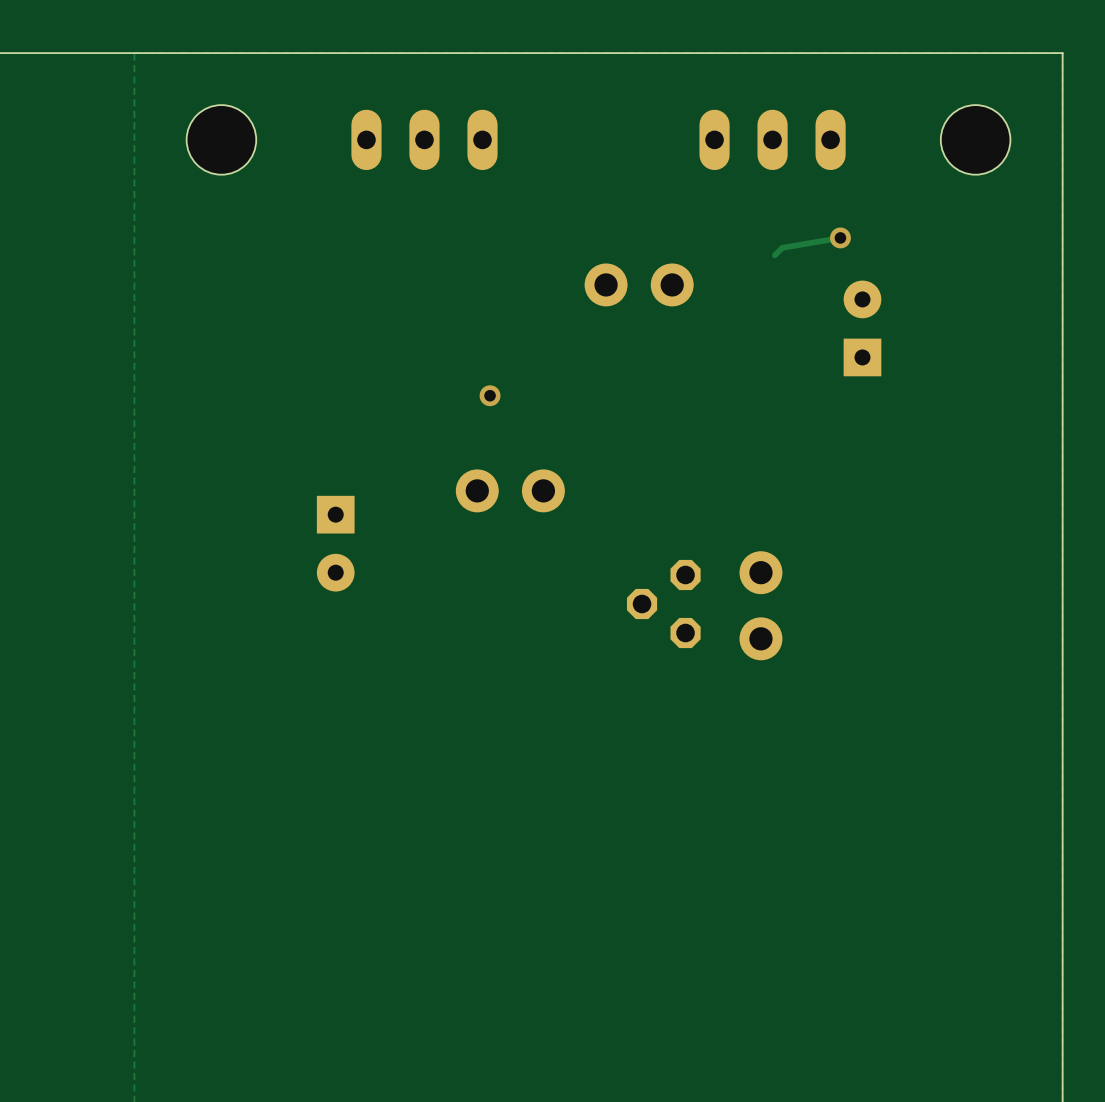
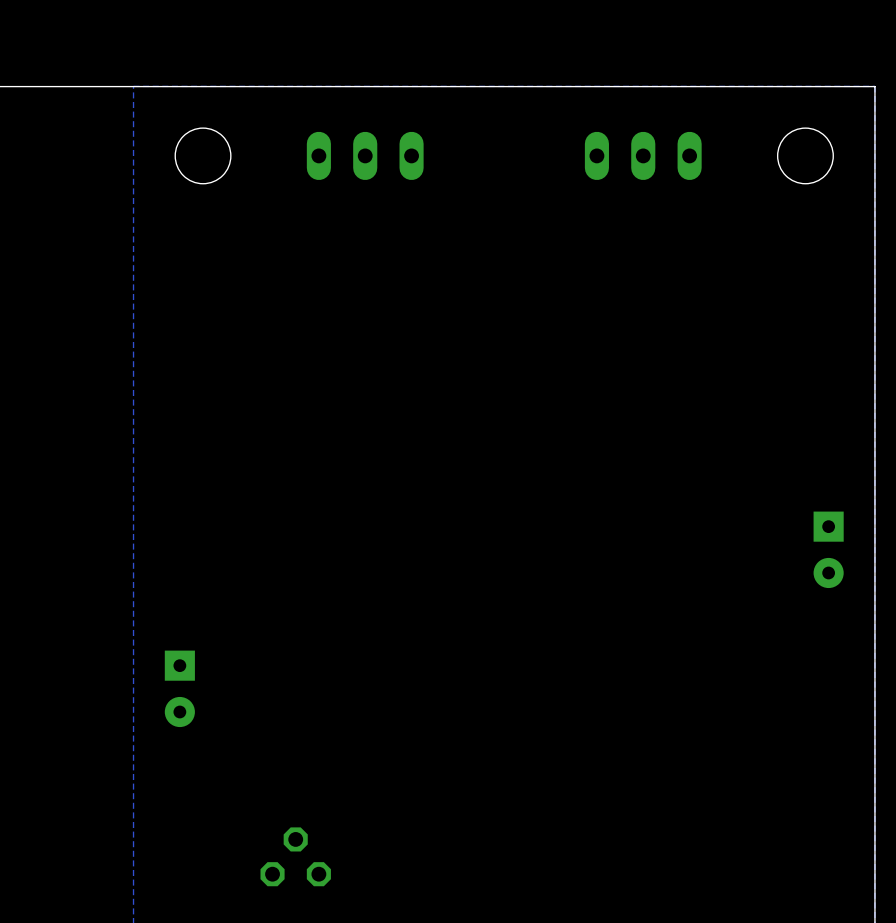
track: (840, 237) (782, 247) (774, 255) -> none
via: (840, 237) -> none
part: (639, 284) -> none
part rotation: 0° (862, 328) -> 180° (828, 549)
part position: (862, 328) -> (828, 549)
via: (490, 395) -> none
part: (510, 490) -> none
part position: (335, 543) -> (179, 688)
part rotation: 0° (663, 604) -> 90° clockwise (295, 856)
part position: (663, 604) -> (295, 856)
part: (760, 605) -> none

